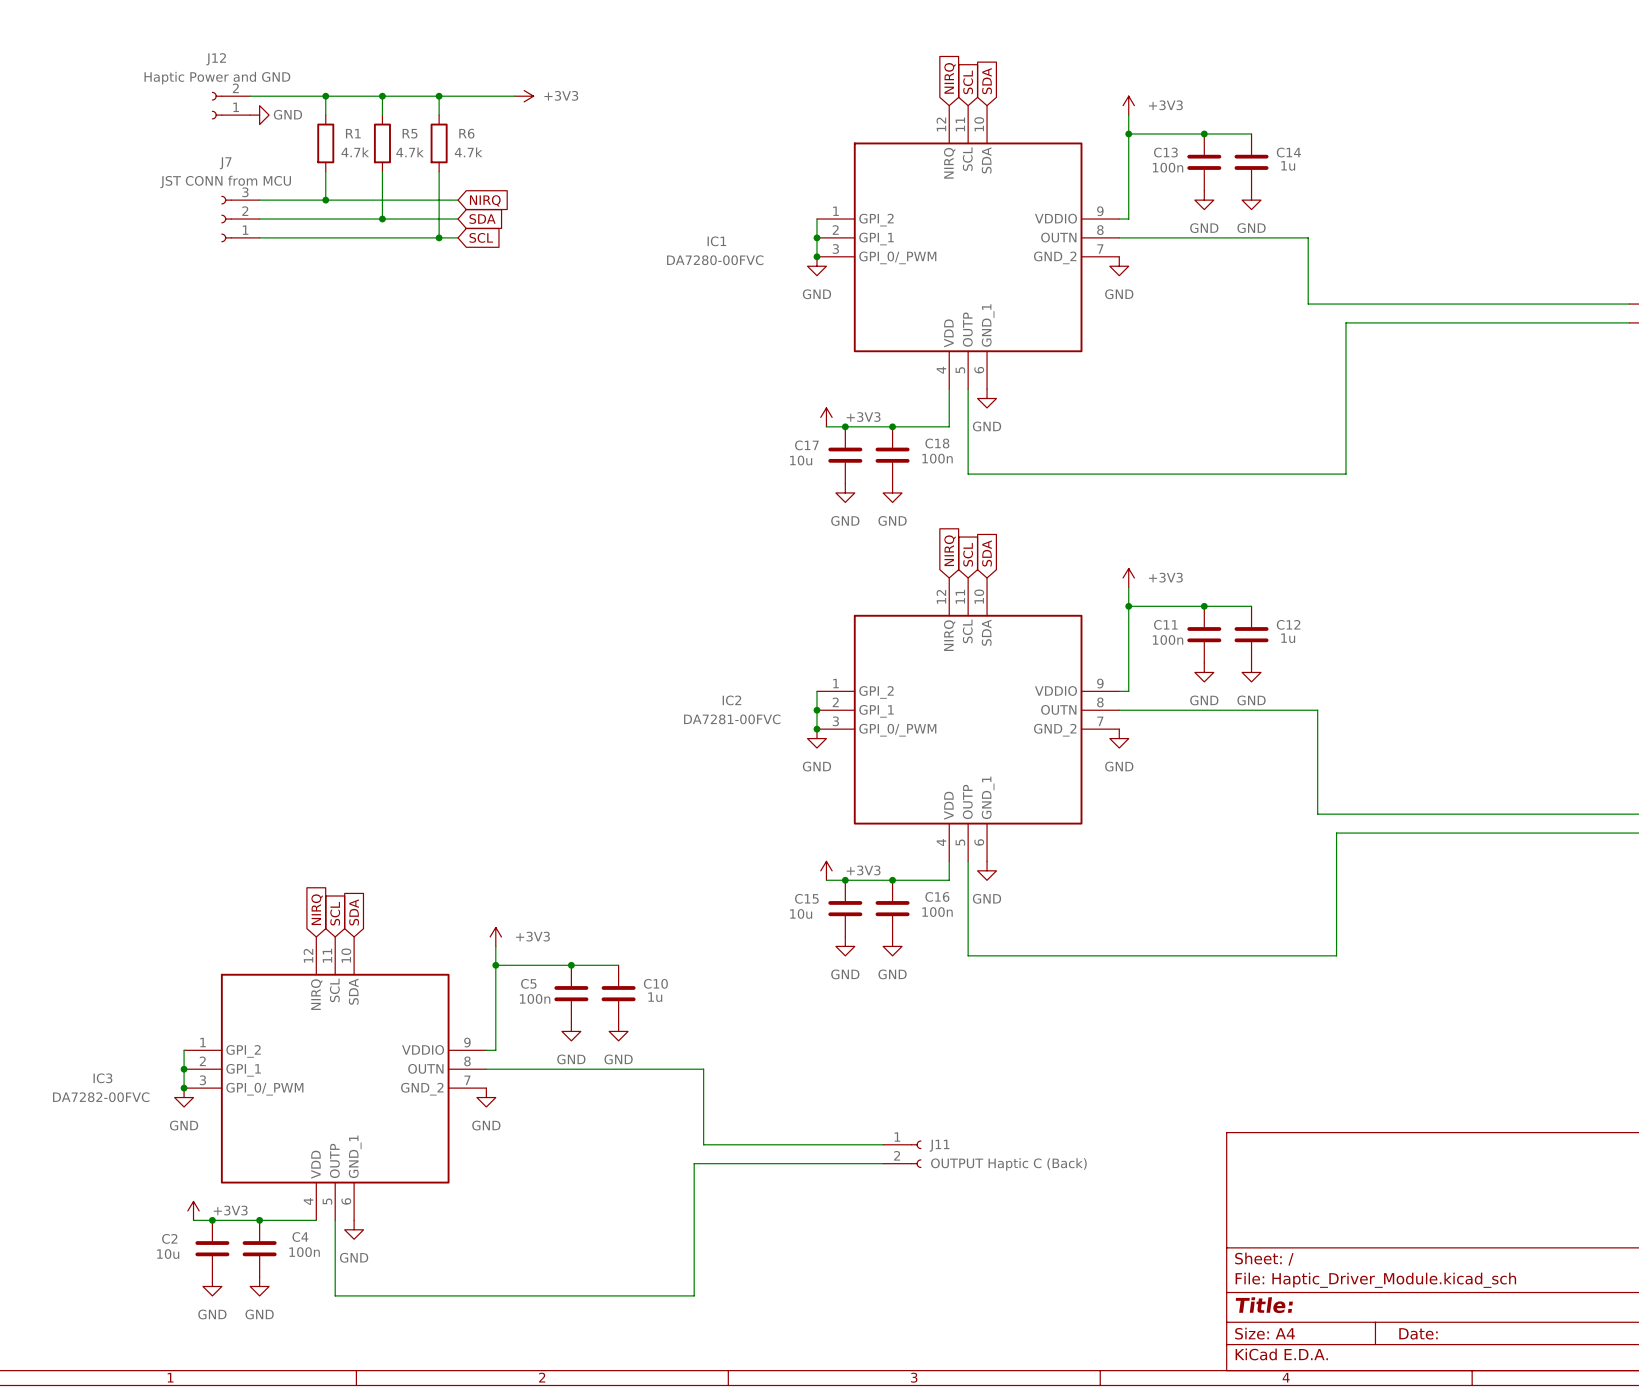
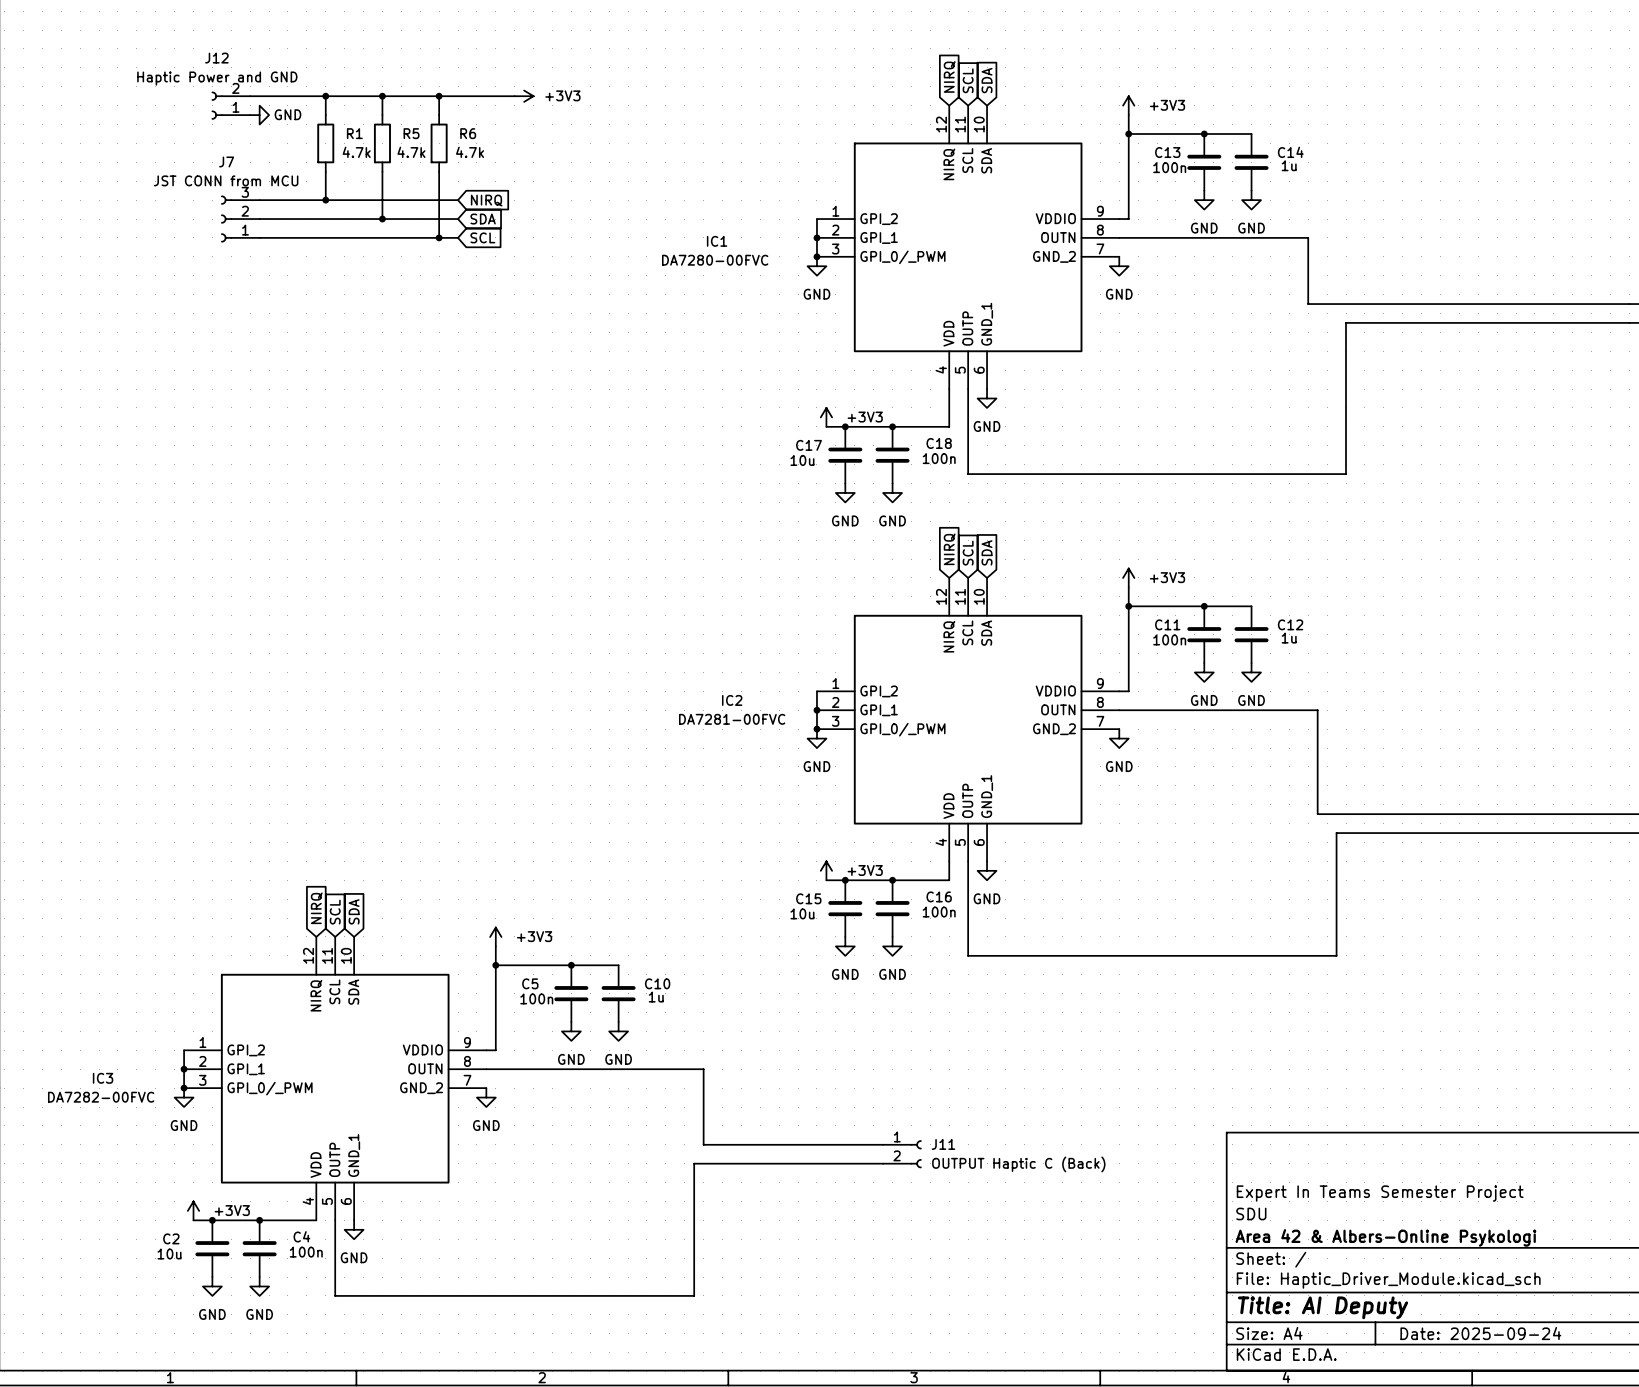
title block: none -> Expert In Teams Semester Project (1380, 1193)
title block: none -> SDU (1251, 1213)
title block: none -> Area 42 & Albers-Online Psykologi (1385, 1237)
title block: Title: (1264, 1305) -> Title: AI Deputy (1323, 1307)
title block: Date: (1418, 1333) -> Date: 2025-09-24 (1480, 1333)

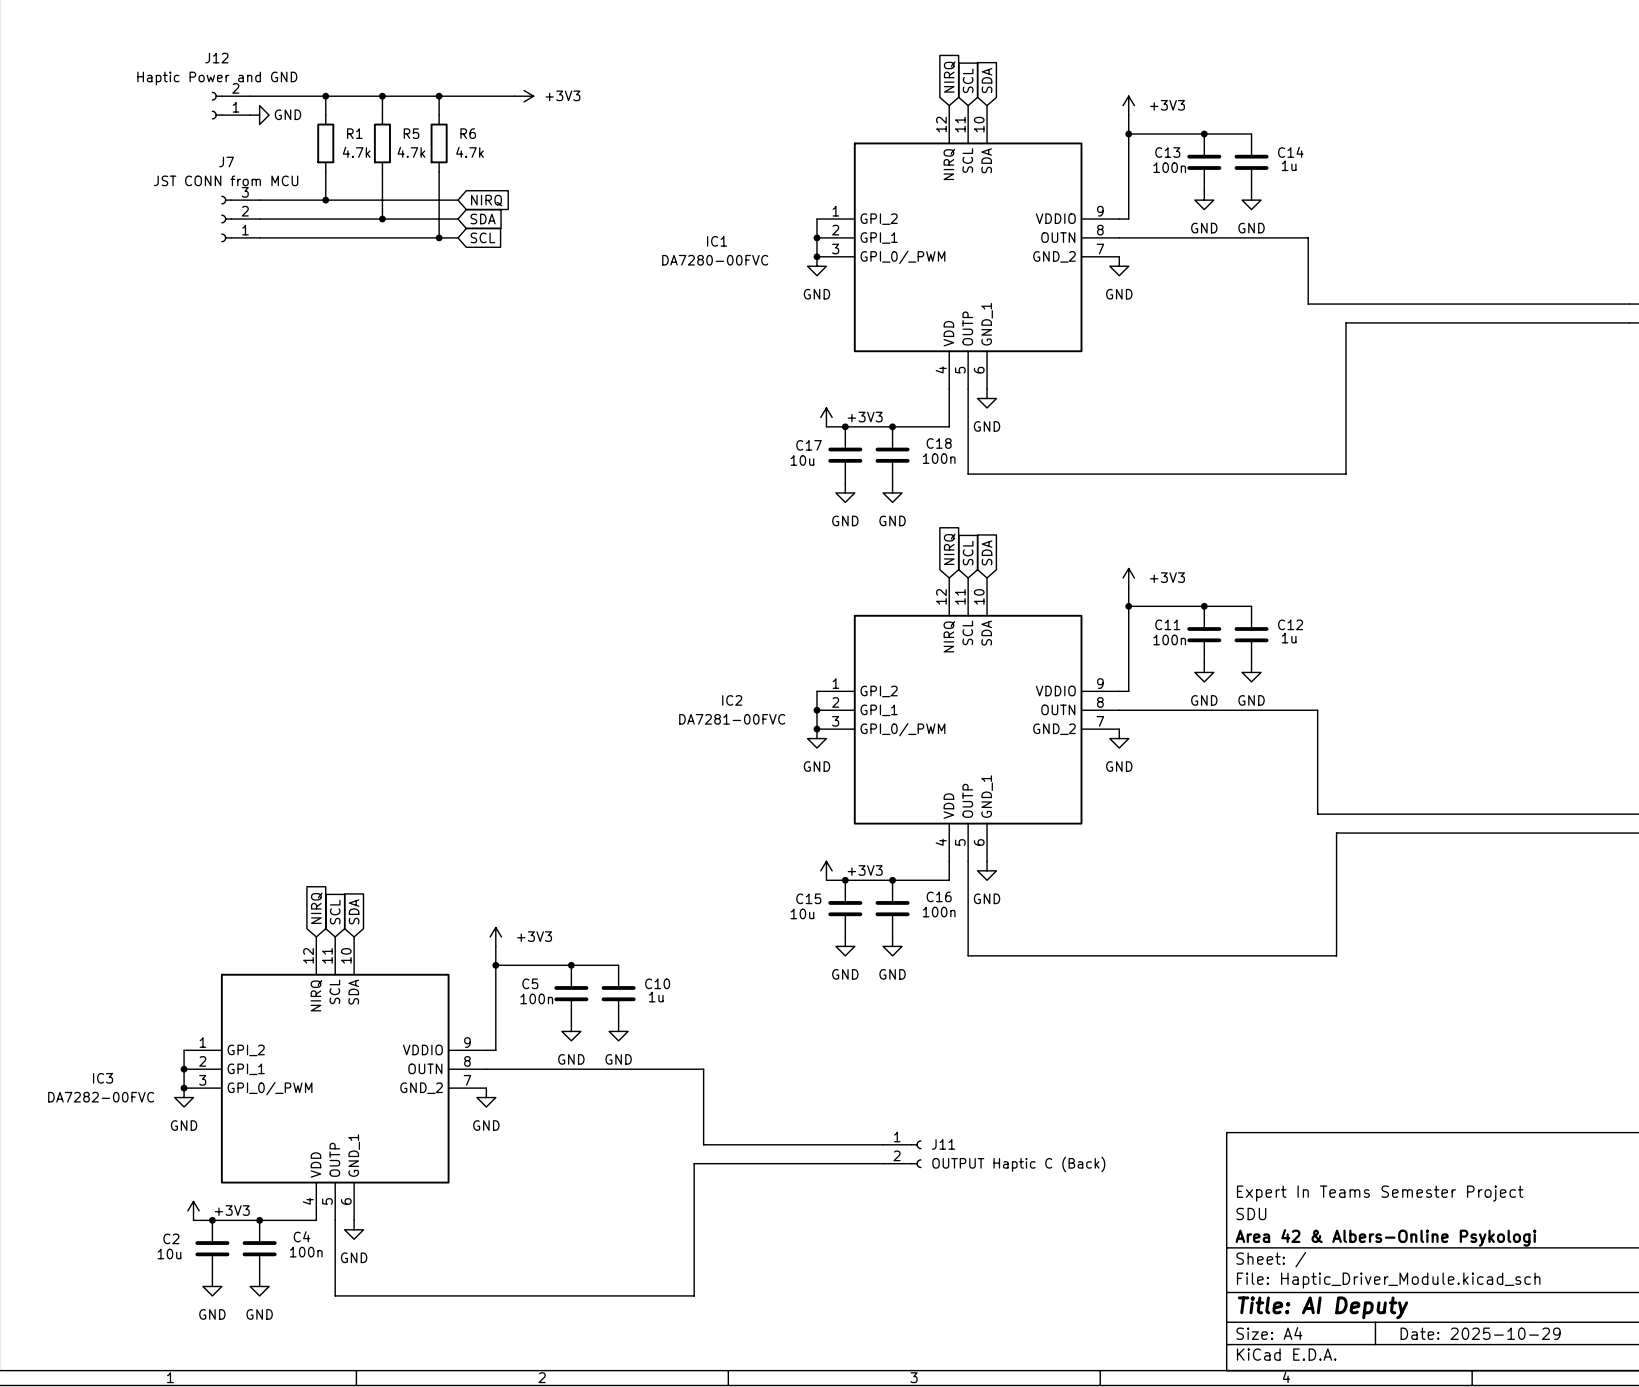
title block: Date: 2025-09-24 (1480, 1333) -> Date: 2025-10-29 (1480, 1333)

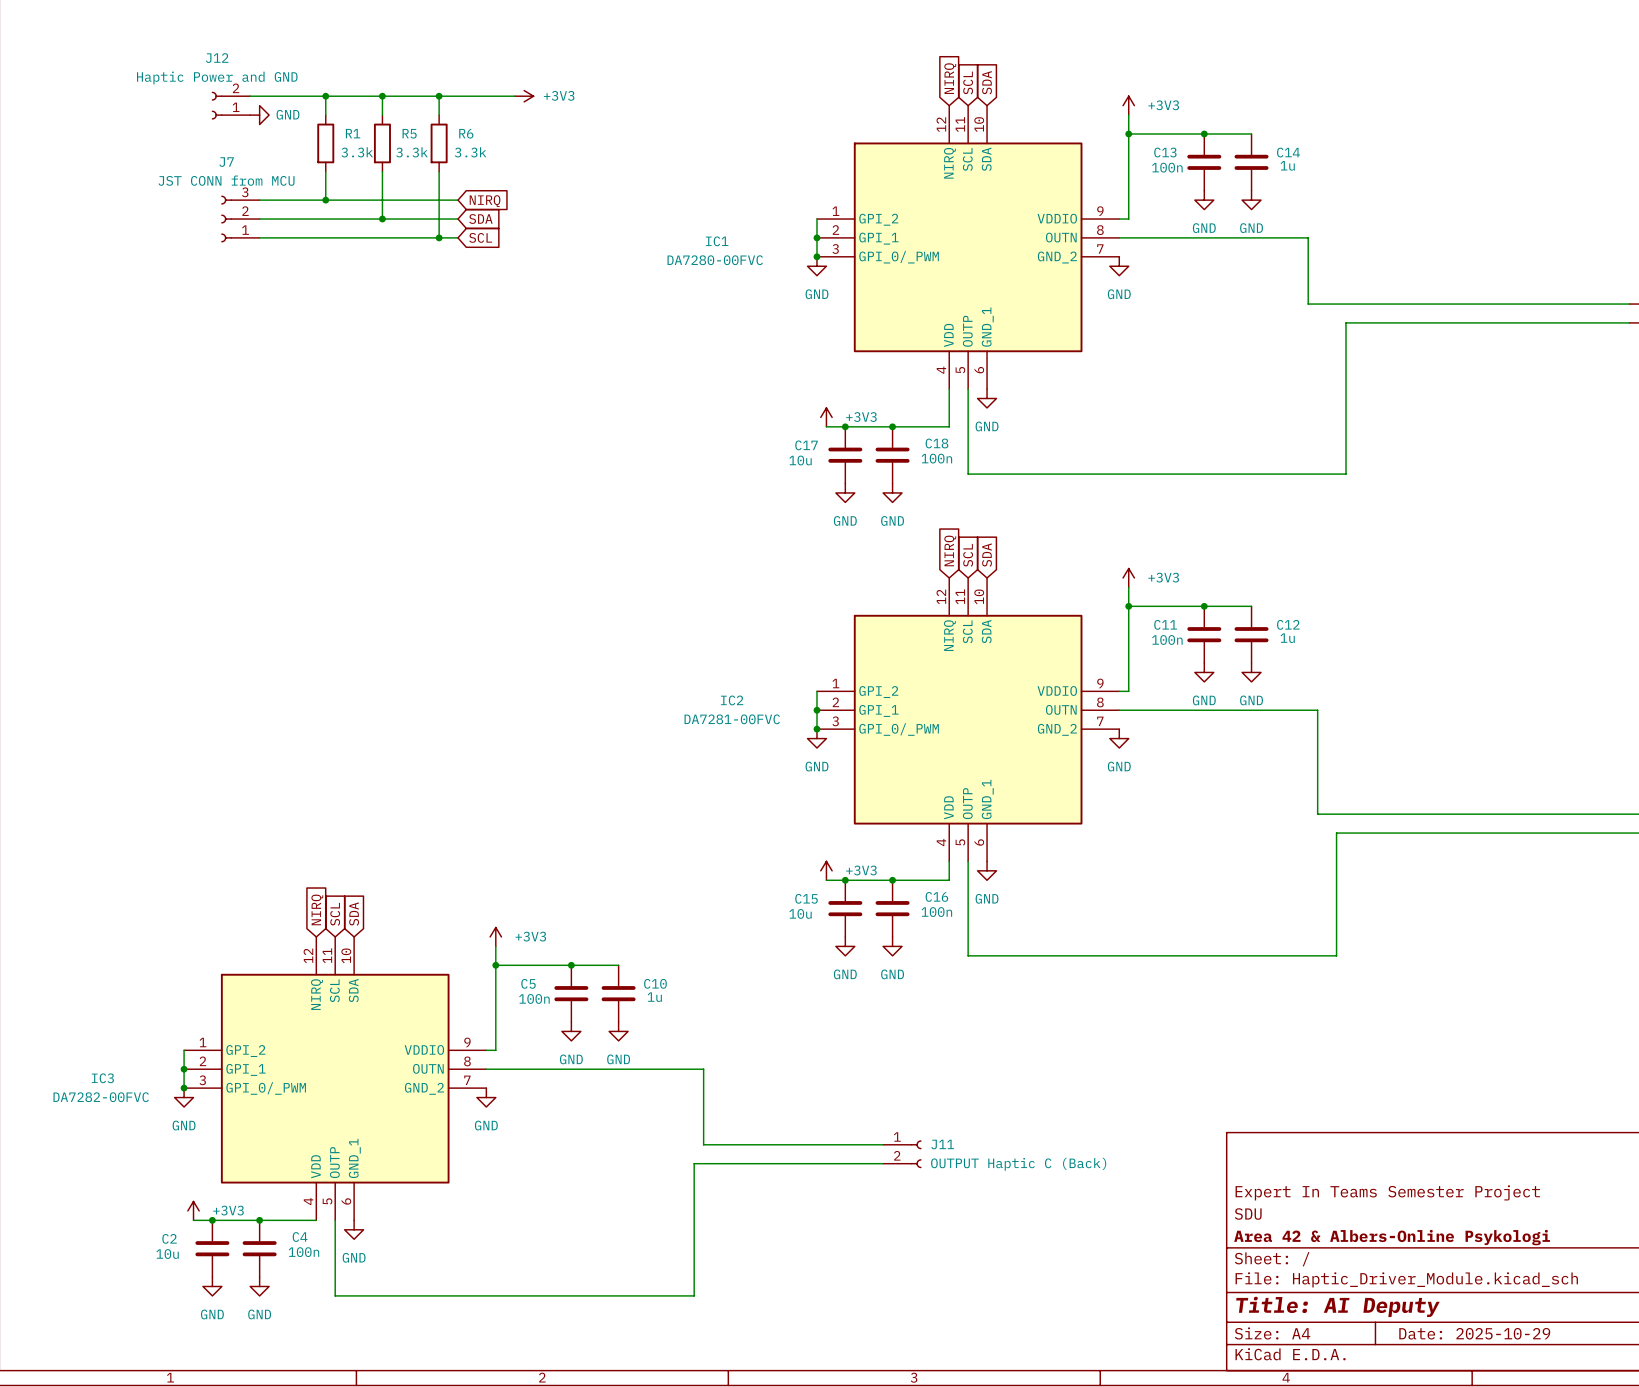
R1 value: 4.7k (356, 152) -> 3.3k (357, 152)
R5 value: 4.7k (411, 152) -> 3.3k (412, 152)
R6 value: 4.7k (470, 152) -> 3.3k (470, 152)

